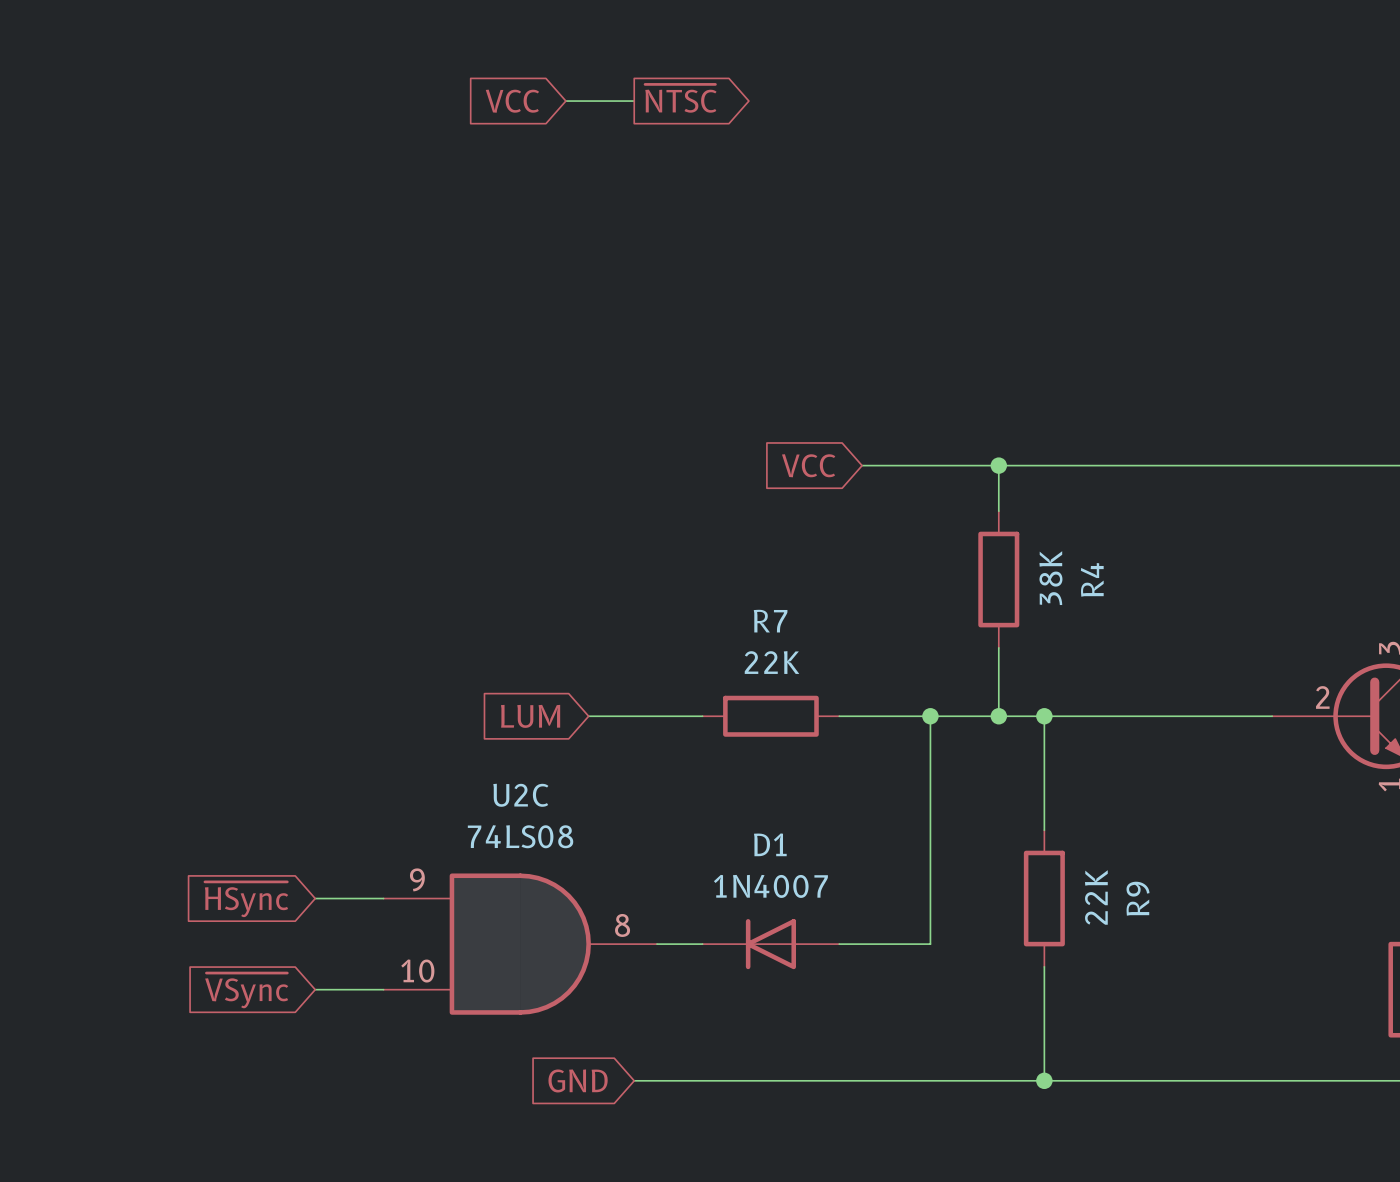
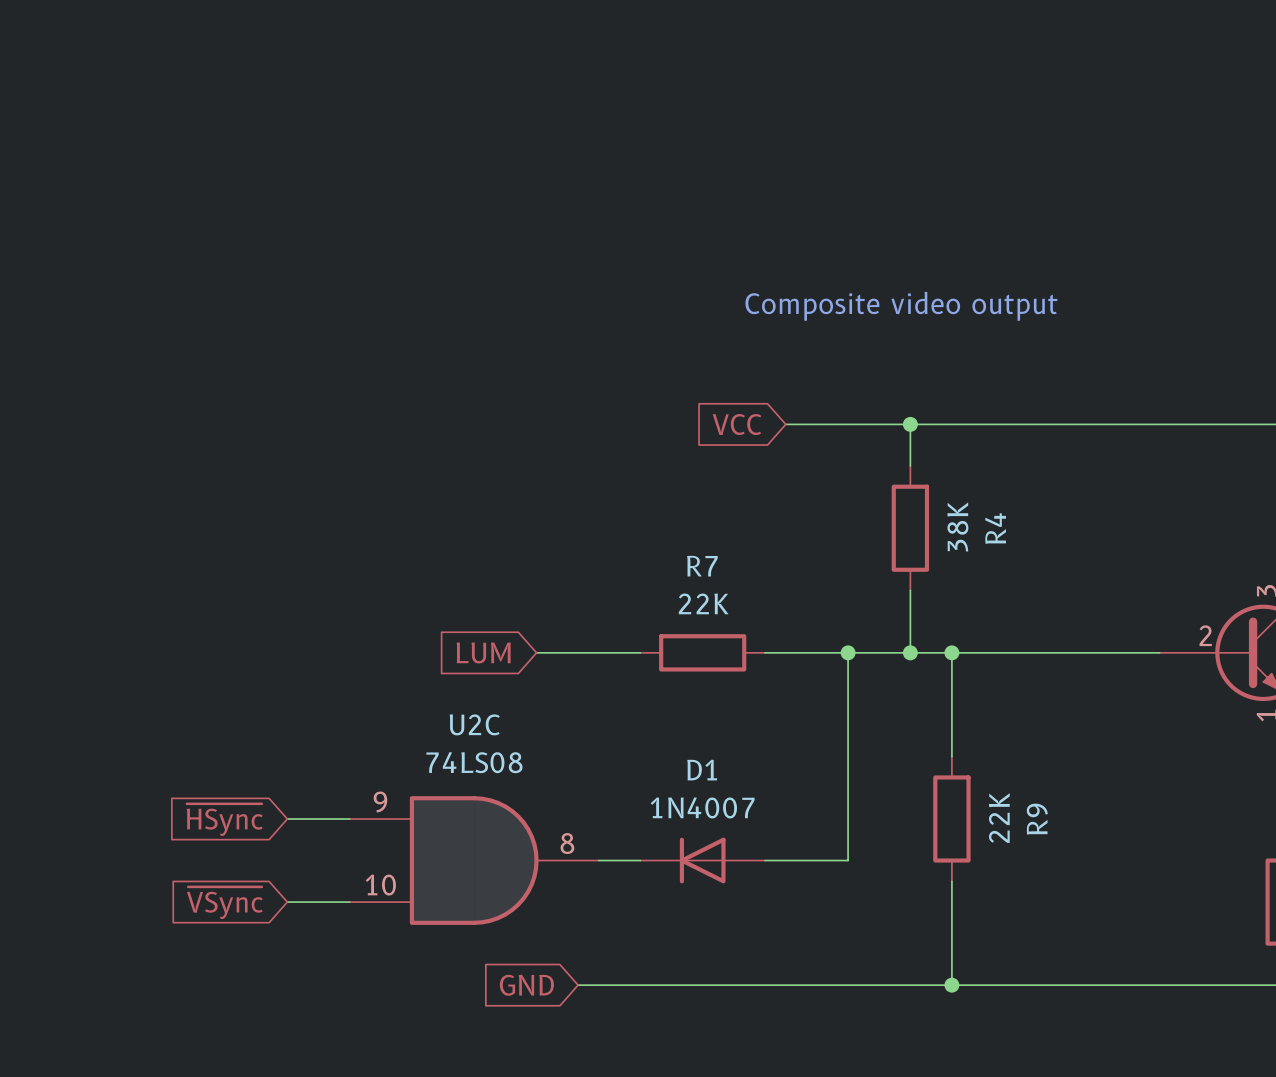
global label: ~{NTSC} (680, 98) -> none
global label: VCC (512, 101) -> none
wire: (565, 101) (634, 101) -> none
text: none -> Composite video output (901, 306)

